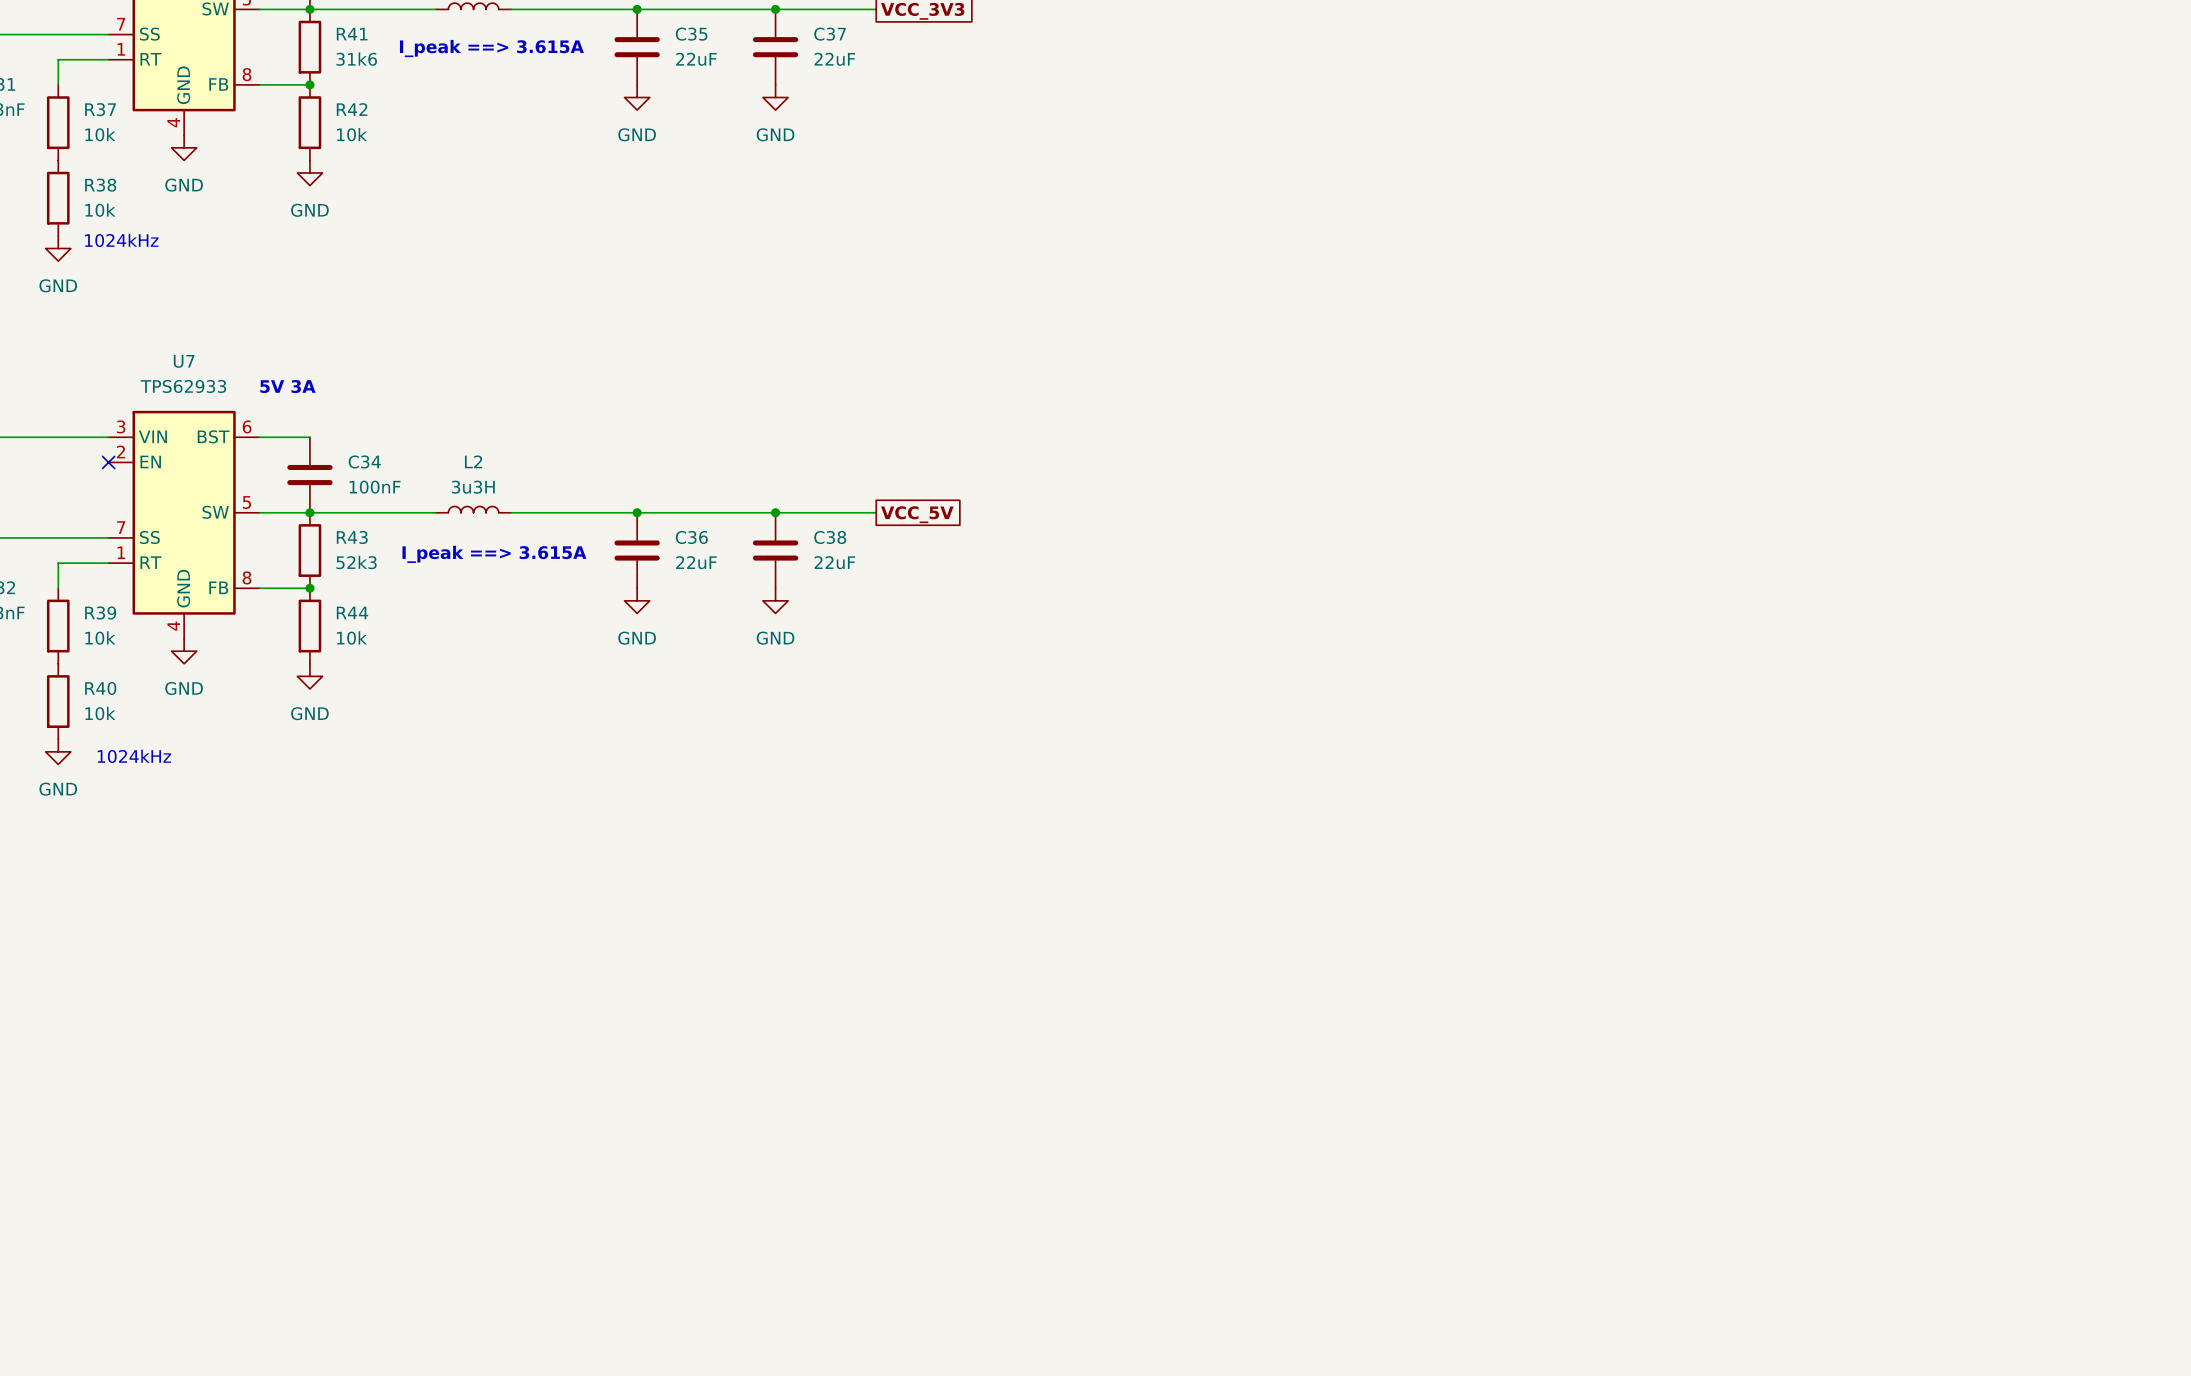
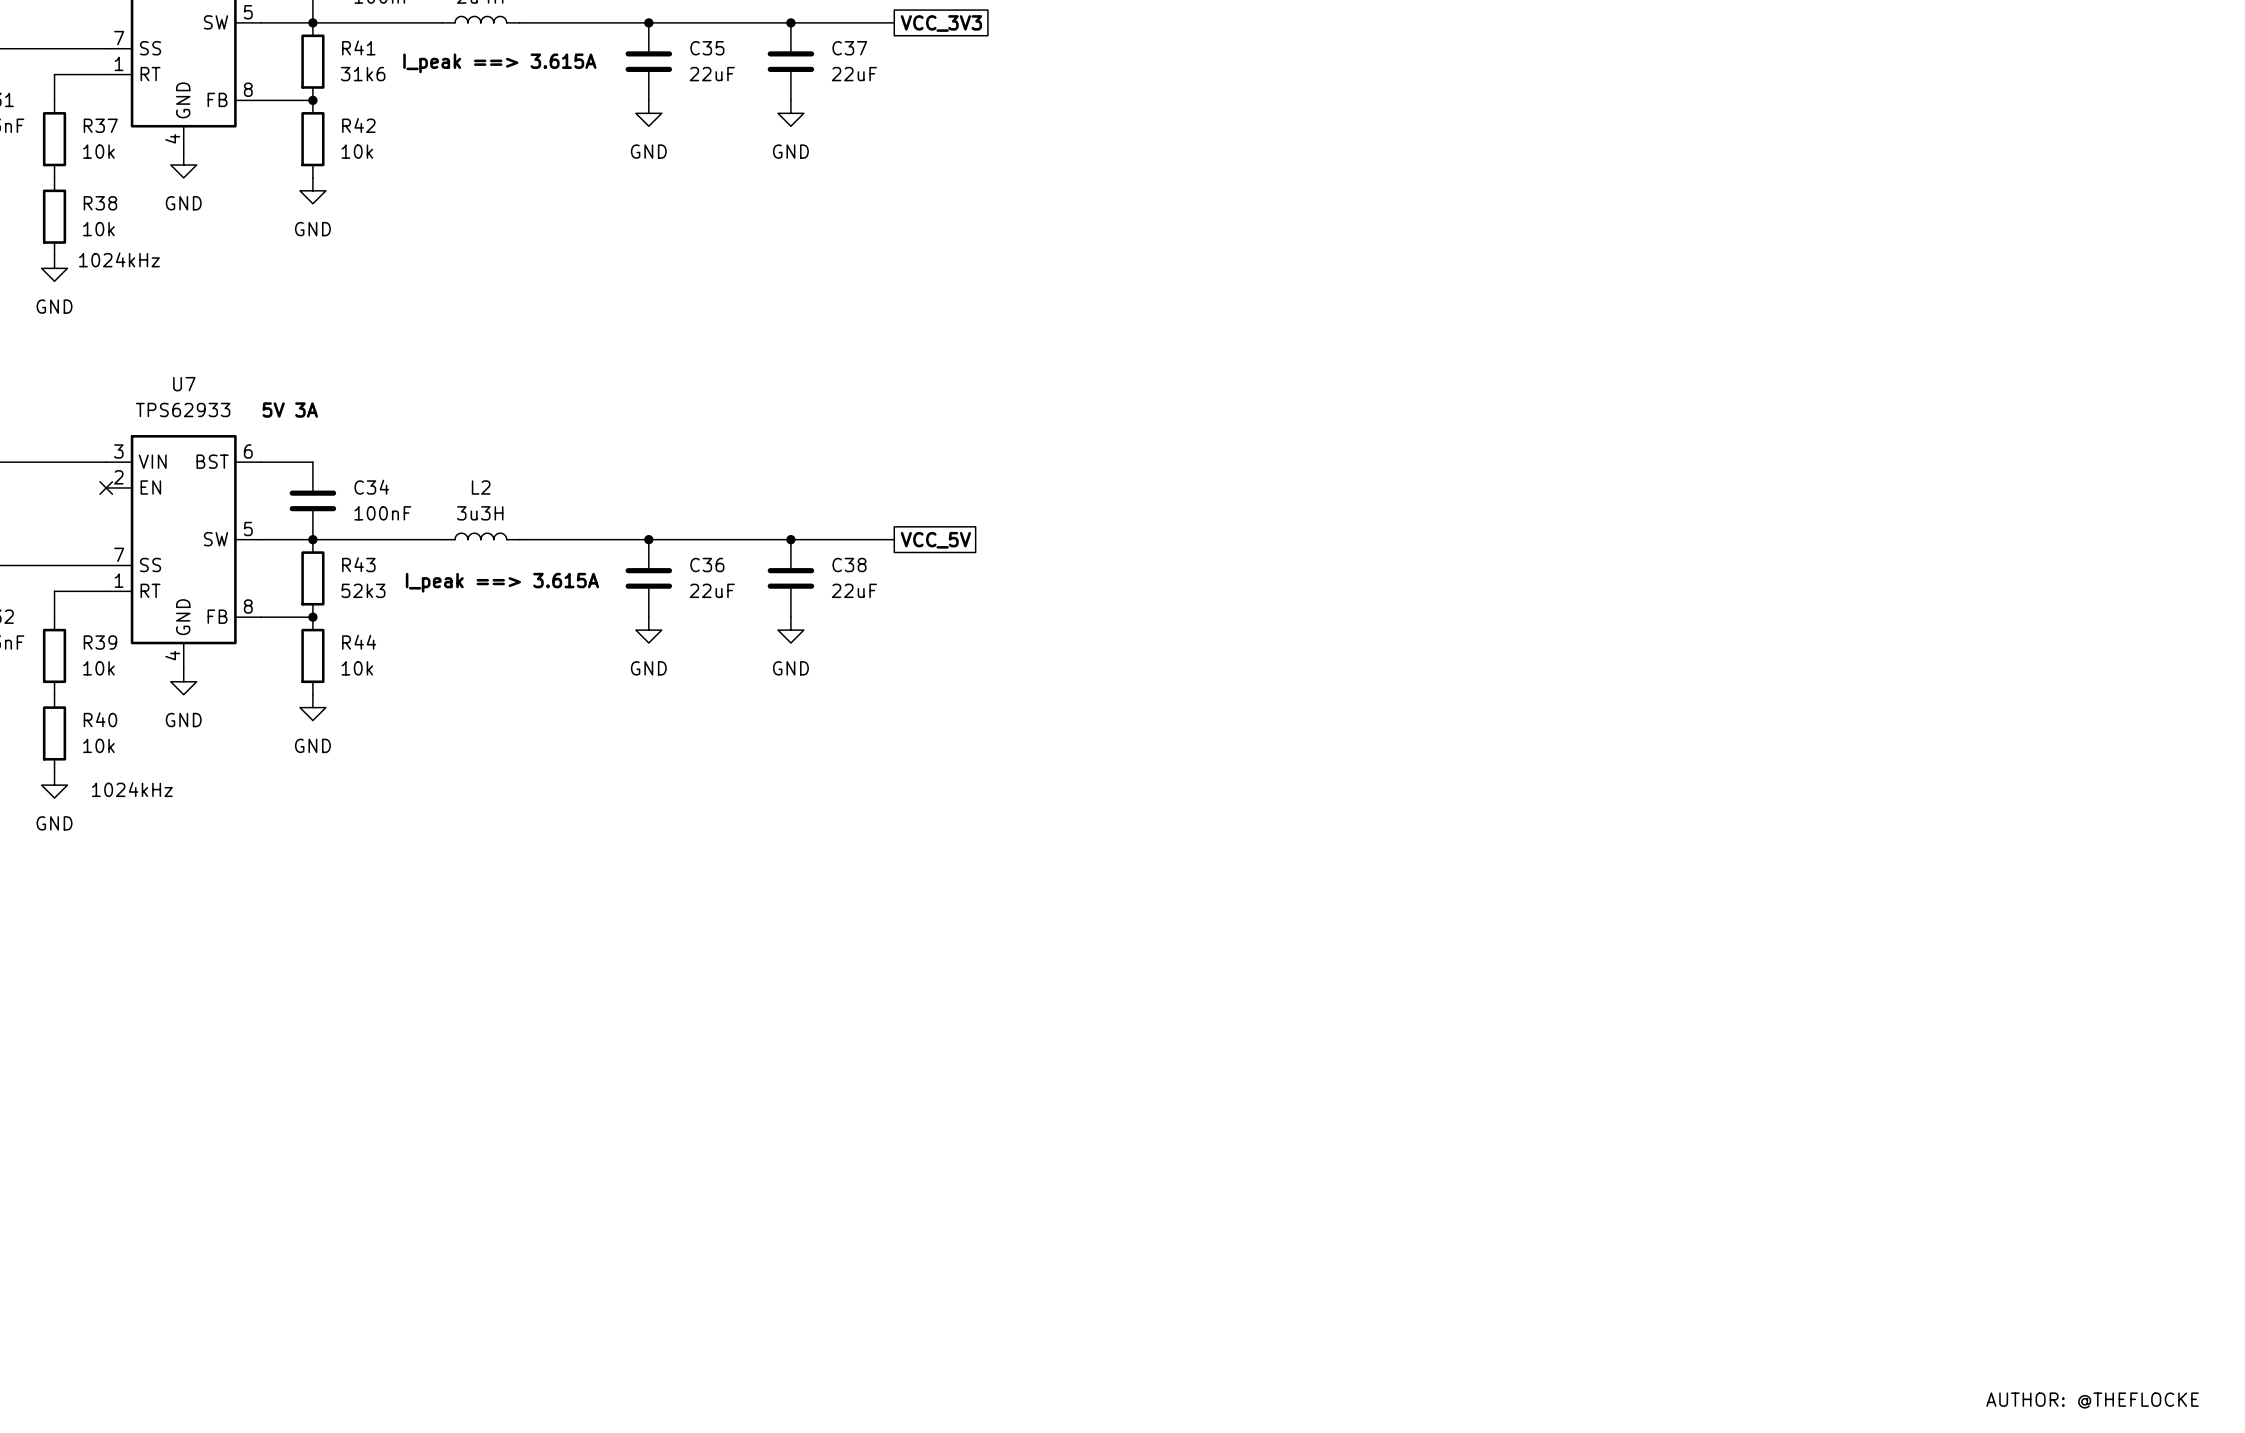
text: none -> AUTHOR: @THEFLOCKE (2092, 1400)

